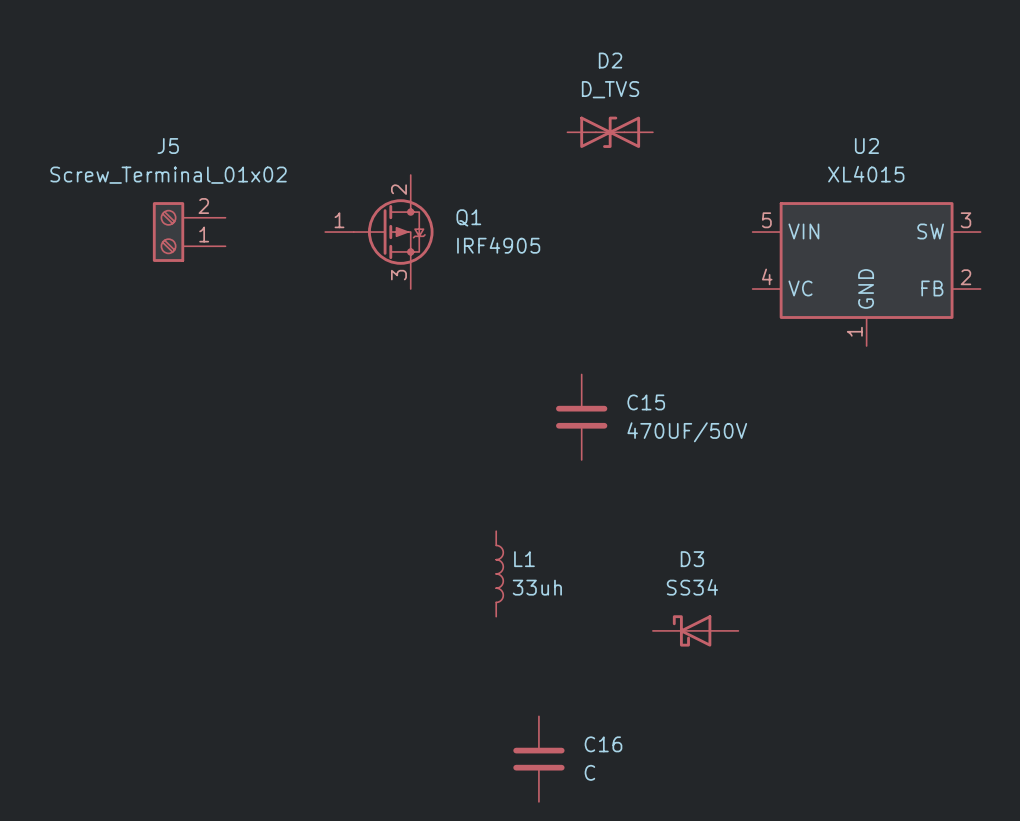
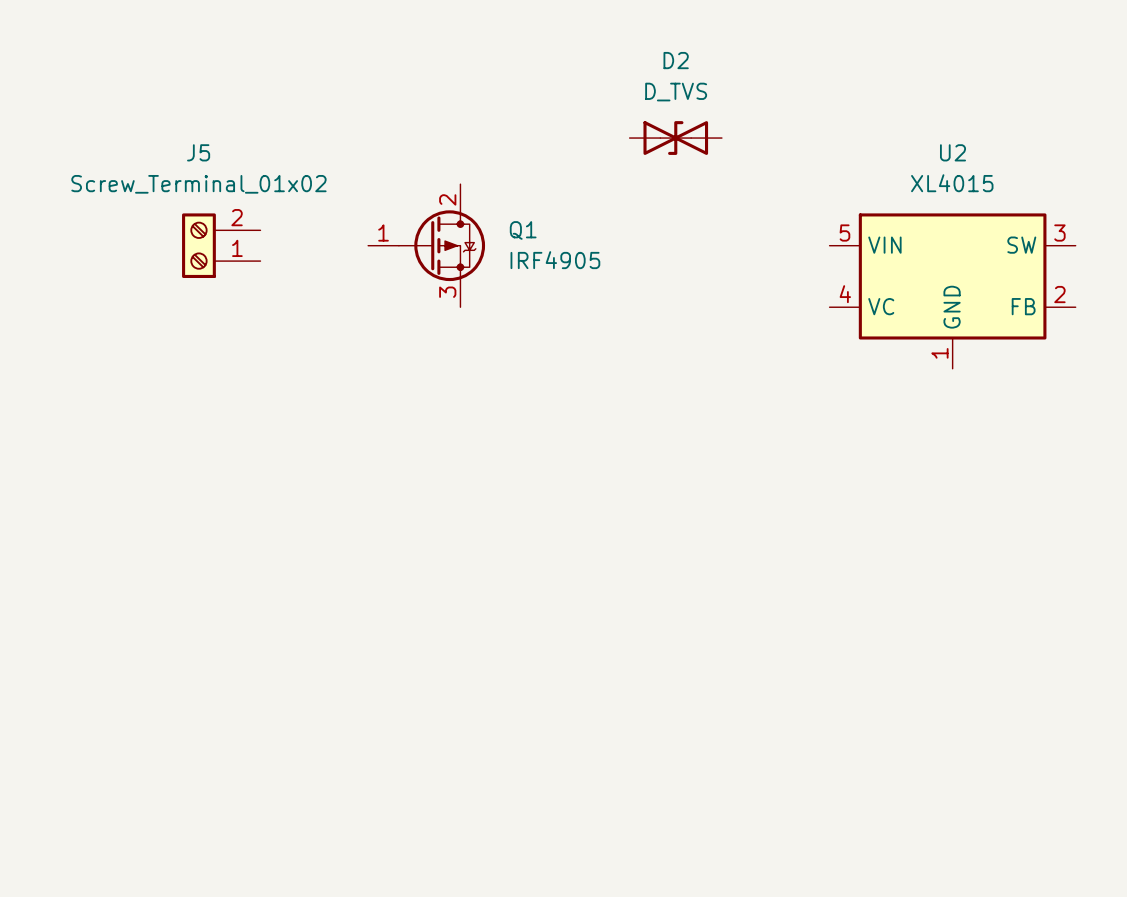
C15: 470UF/50V (581, 417) -> none
L1: 33uh (499, 573) -> none
D3: SS34 (695, 630) -> none
C16: C (538, 759) -> none

